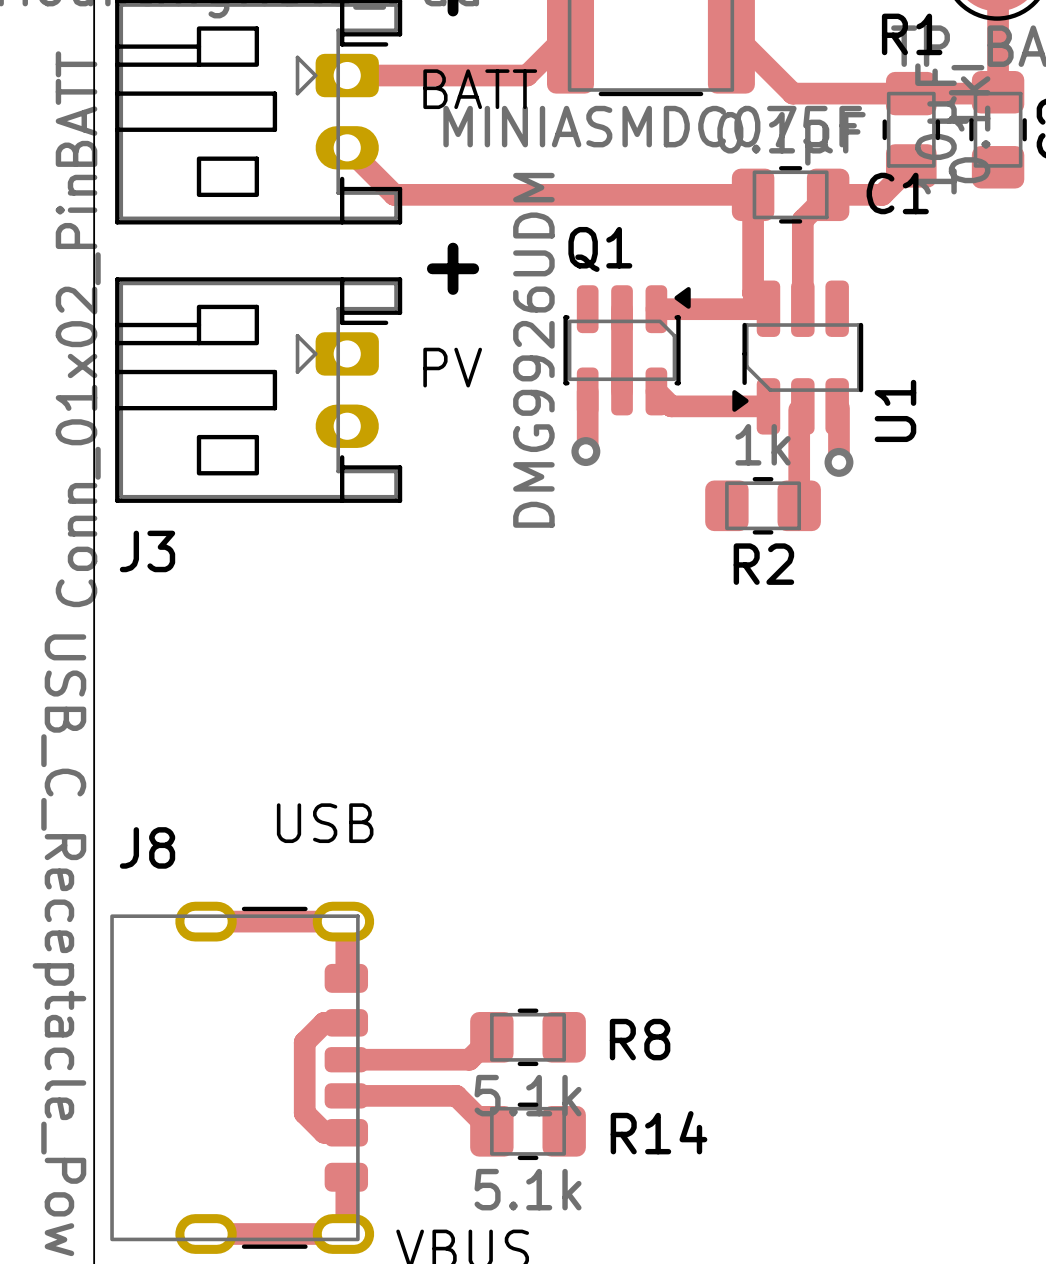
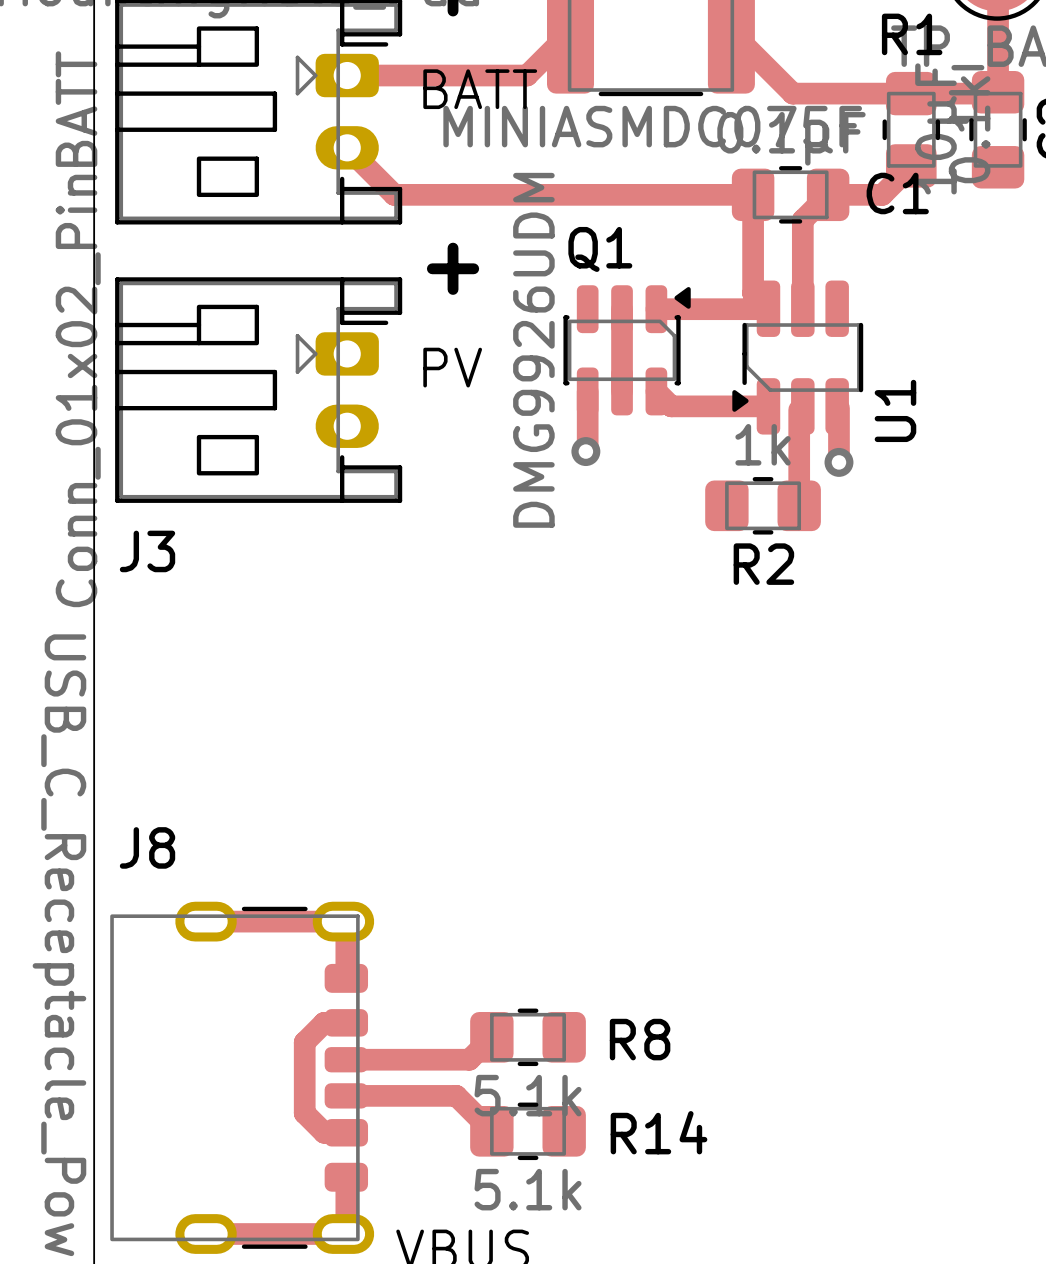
text: USB (325, 823) -> none

